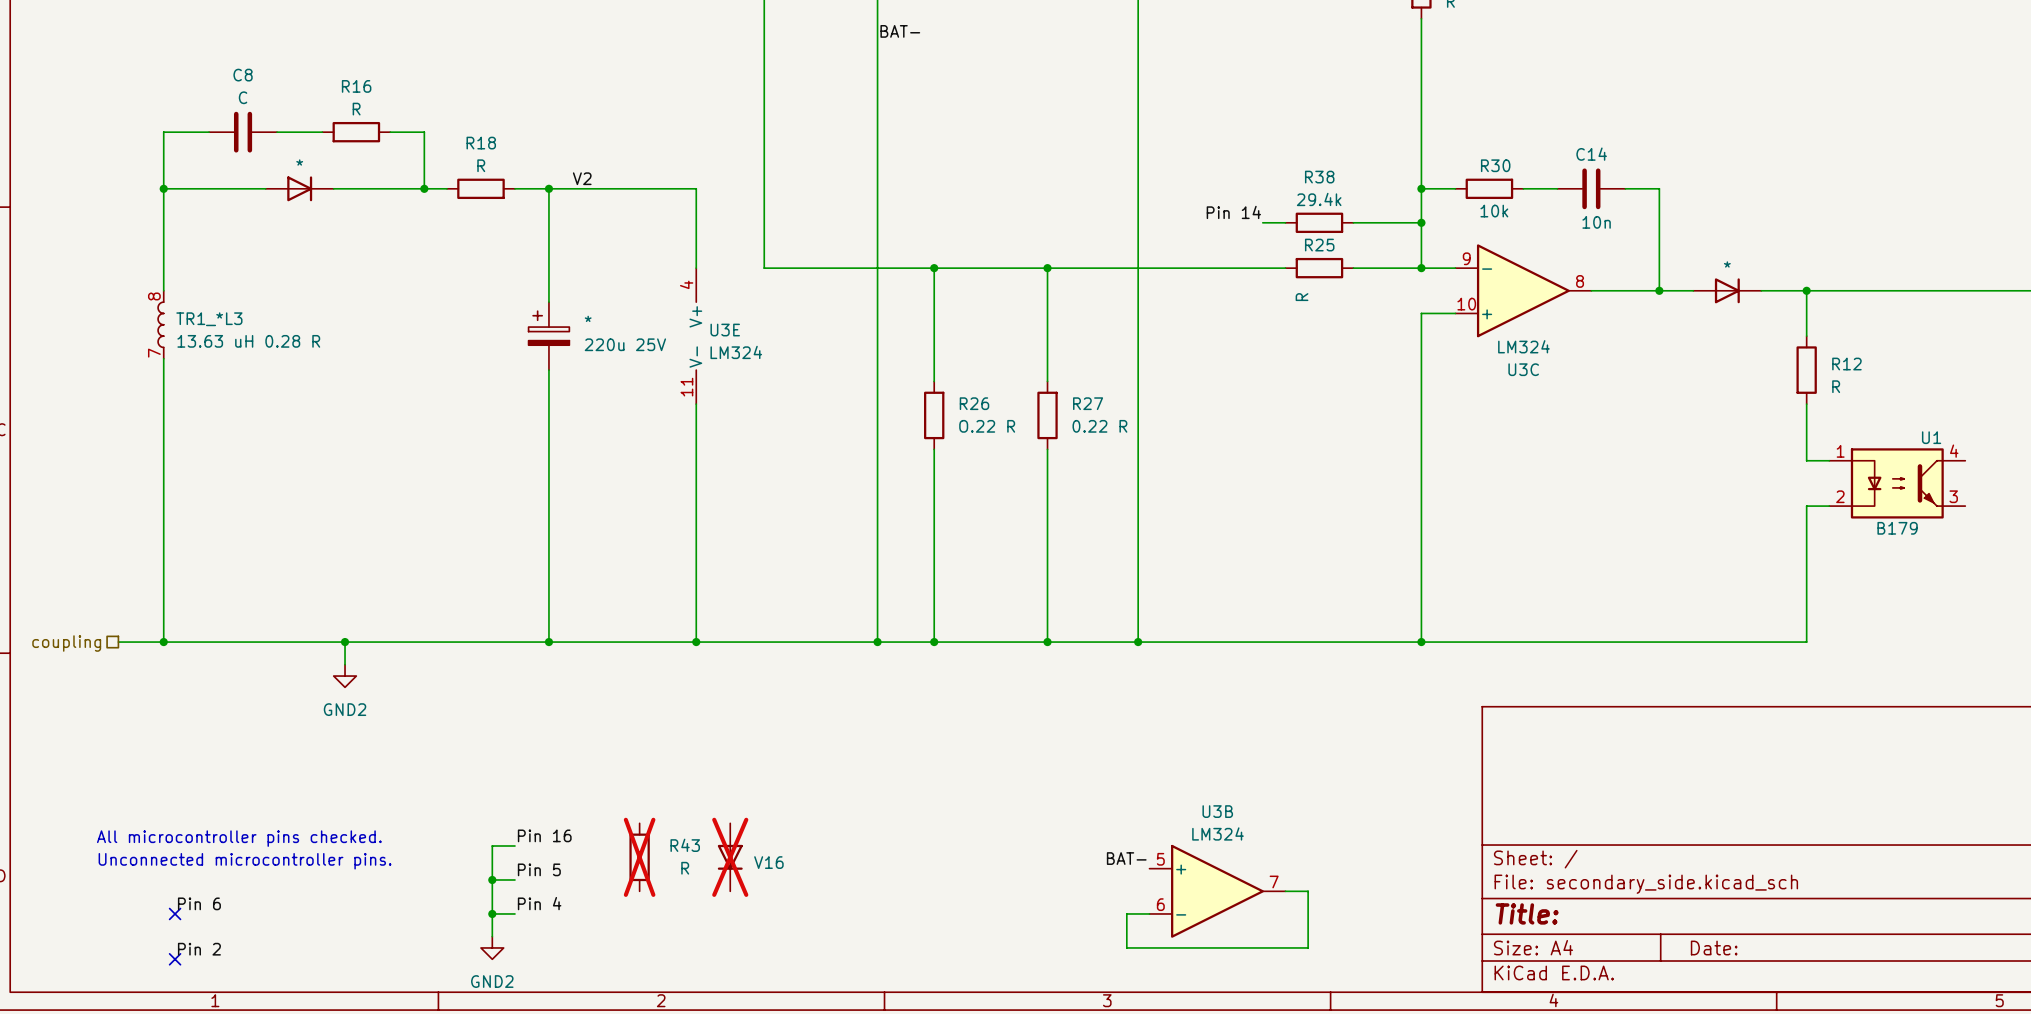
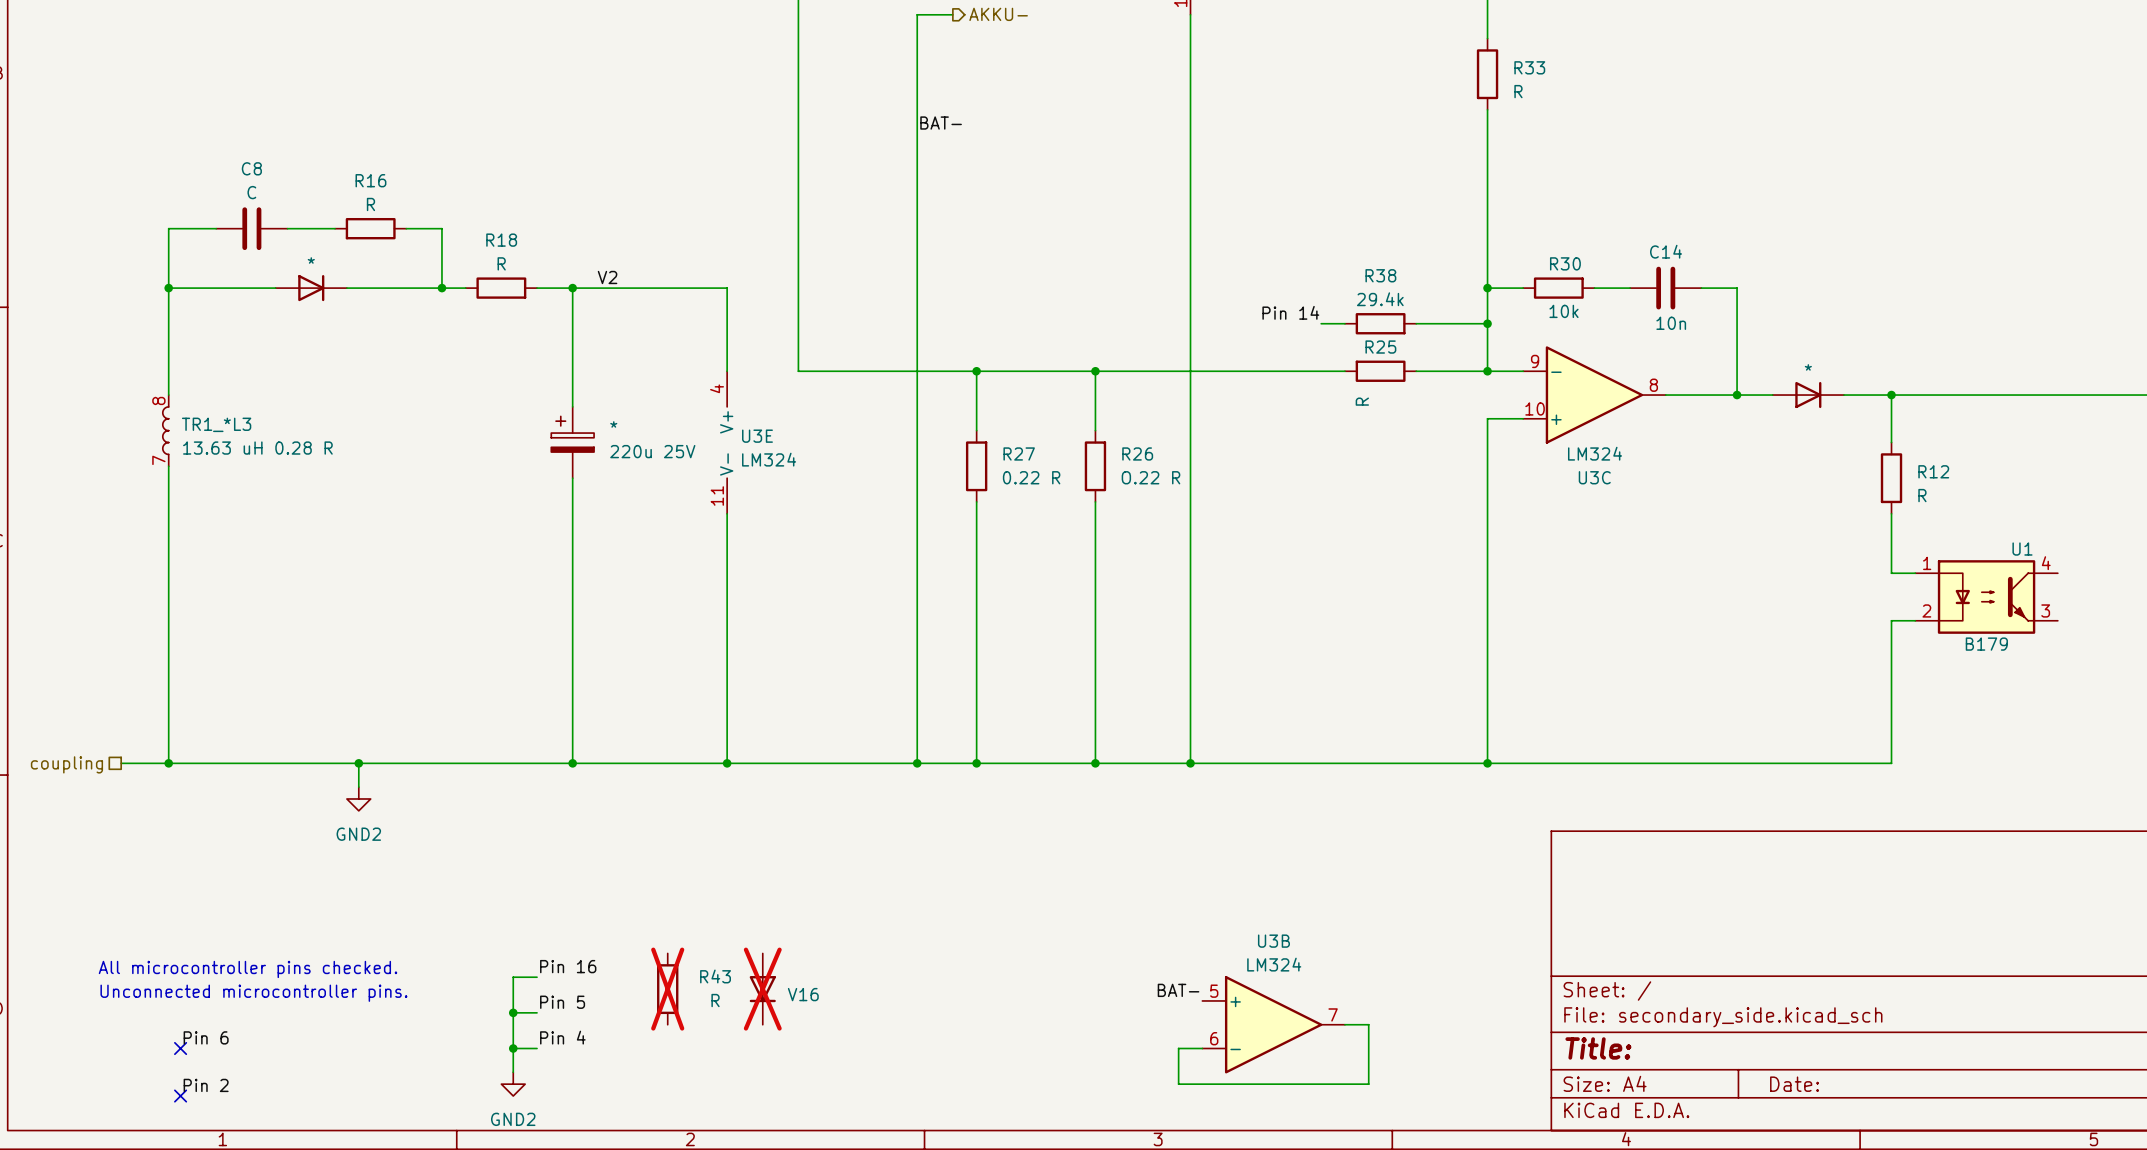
wire: (934, 324) (934, 381) -> (976, 501) (976, 561)
wire: (1047, 324) (1047, 381) -> (1095, 501) (1095, 561)
R26 position: (934, 415) -> (1095, 466)
R27 position: (1047, 415) -> (976, 466)

